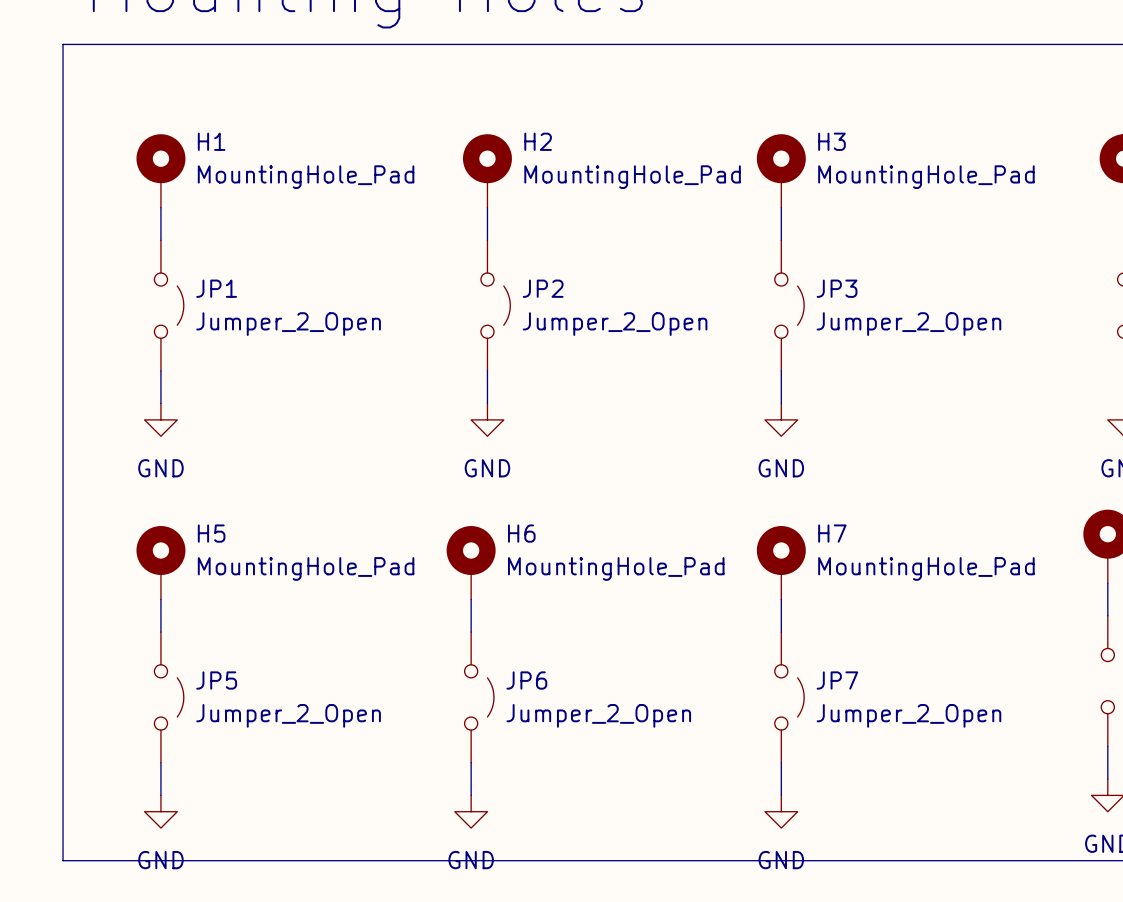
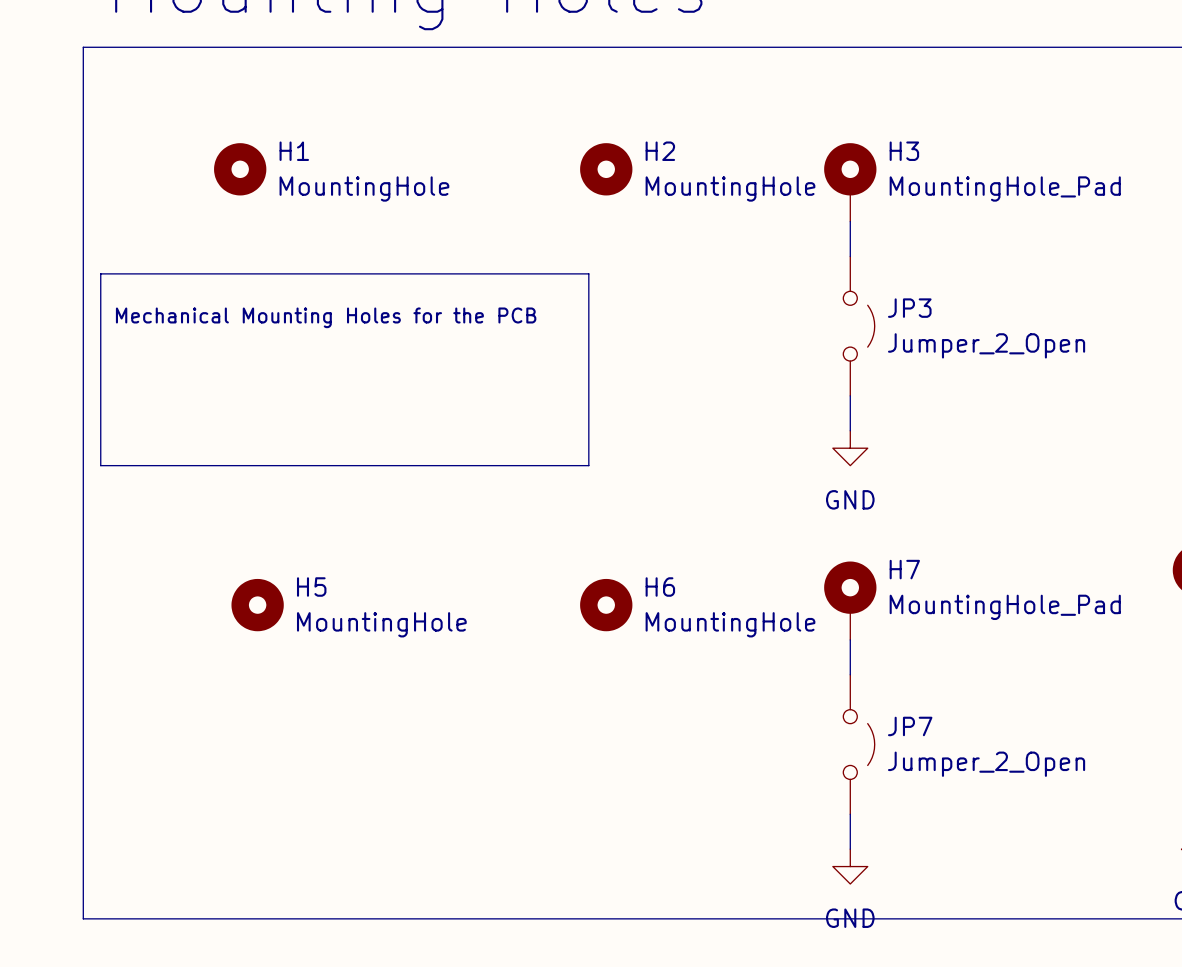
H1 symbol: [136, 134, 186, 208] -> [214, 143, 267, 196]
H2 symbol: [462, 134, 512, 208] -> [580, 143, 633, 196]
H1 value: MountingHole_Pad (306, 177) -> MountingHole (364, 188)
H2 value: MountingHole_Pad (632, 177) -> MountingHole (730, 188)
wire: (160, 207) (160, 240) -> none
wire: (487, 207) (487, 240) -> none
line: none -> (100, 273) (588, 273) (588, 465) (100, 465) (100, 273)
text: none -> Mechanical Mounting Holes for the PCB (326, 317)
JP1: Jumper_2_Open (169, 305) -> none
JP2: Jumper_2_Open (495, 305) -> none
wire: (160, 370) (160, 403) -> none
wire: (487, 370) (487, 403) -> none
power symbol: GND (160, 419) -> none
power symbol: GND (487, 419) -> none
H5 symbol: [136, 526, 186, 600] -> [231, 578, 284, 632]
H6 symbol: [446, 526, 496, 600] -> [580, 578, 633, 632]
H5 value: MountingHole_Pad (306, 568) -> MountingHole (381, 624)
H6 value: MountingHole_Pad (616, 568) -> MountingHole (730, 624)
wire: (160, 599) (160, 632) -> none
wire: (471, 599) (471, 632) -> none
JP5: Jumper_2_Open (169, 697) -> none
JP6: Jumper_2_Open (479, 697) -> none
wire: (160, 762) (160, 795) -> none
wire: (471, 762) (471, 795) -> none
power symbol: GND (160, 811) -> none
power symbol: GND (471, 811) -> none

